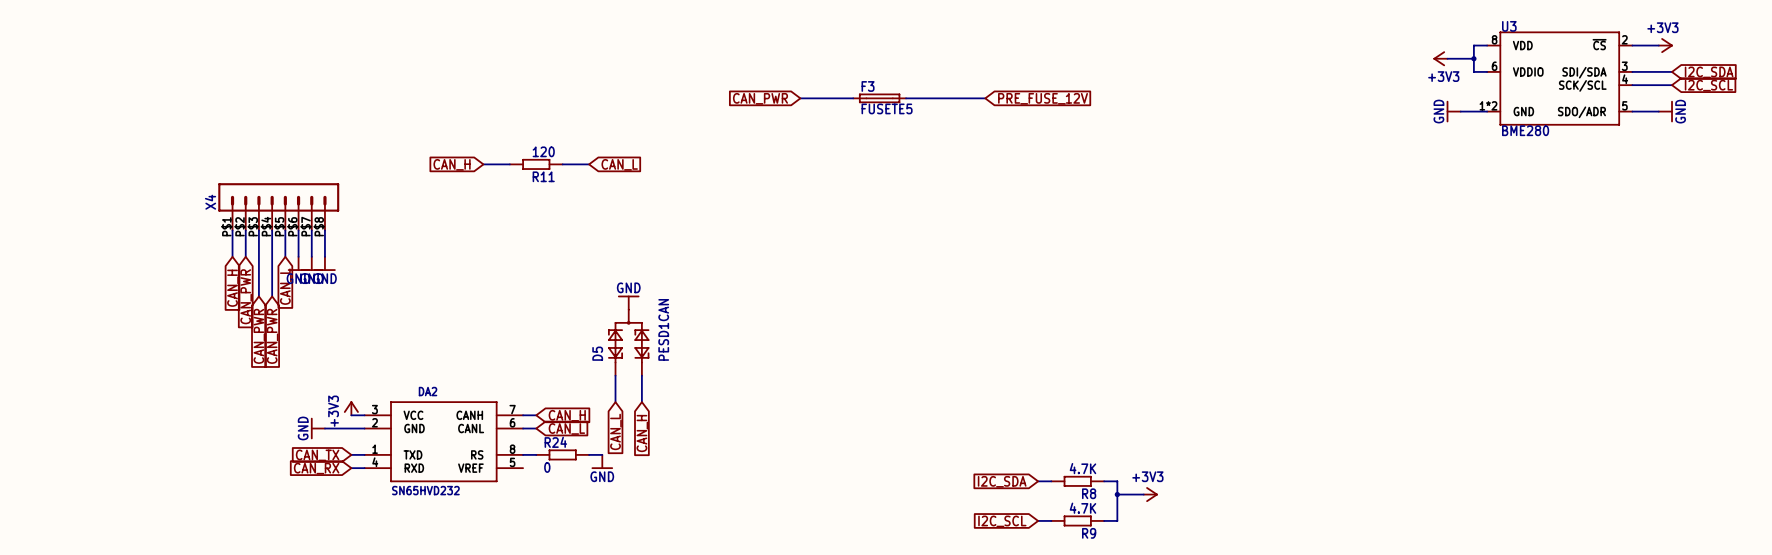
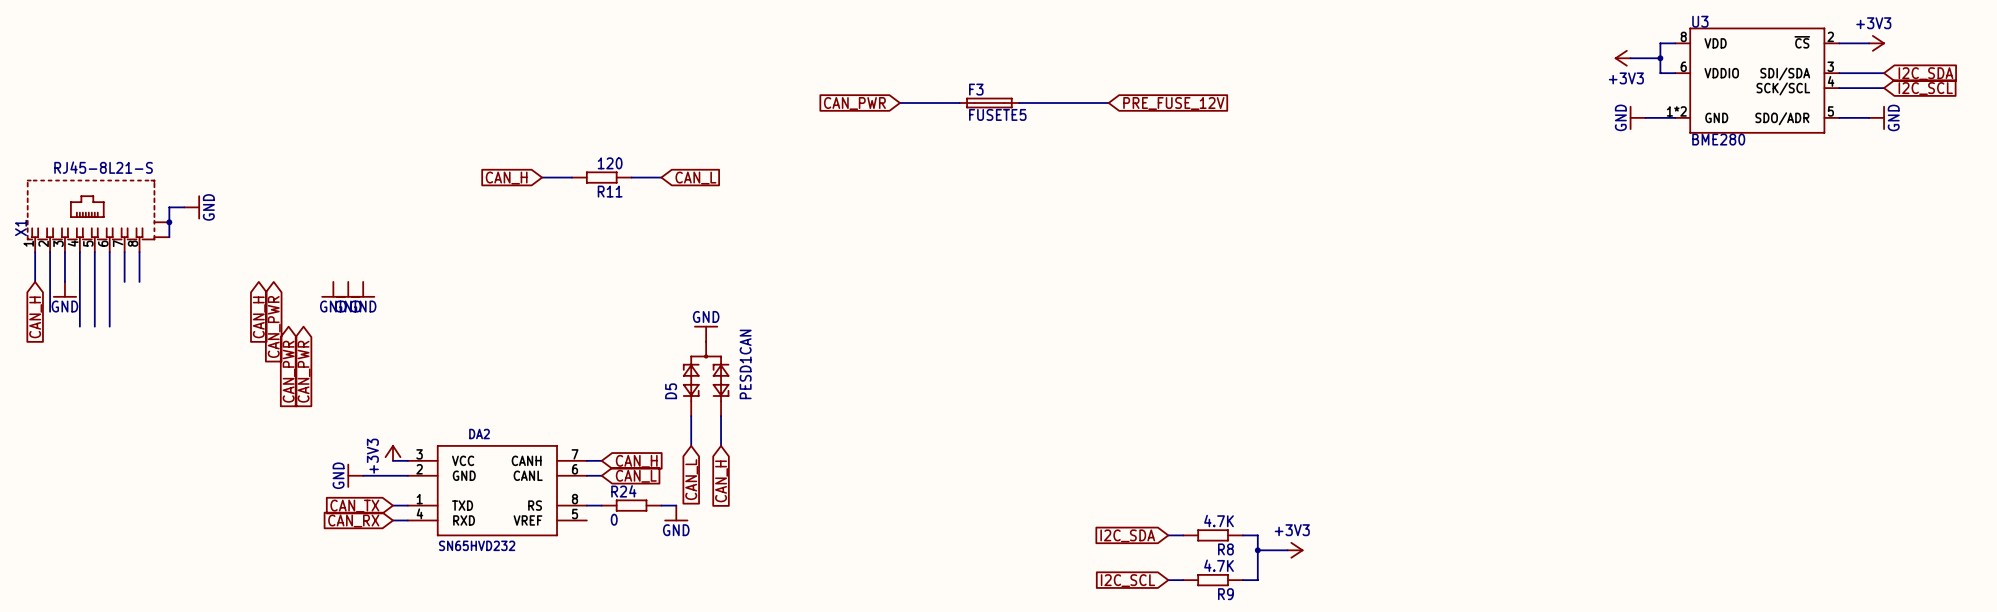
wire: none -> (184, 207) (169, 207) (169, 237)
power symbol: none -> GND (192, 207)
X1: none -> RJ45-8L21-S (98, 216)
junction: none -> (169, 222)
X4: (278, 206) -> none
wire: none -> (35, 252) (35, 281)
wire: none -> (50, 252) (50, 311)
wire: none -> (64, 252) (64, 281)
wire: none -> (79, 252) (79, 326)
wire: none -> (94, 252) (94, 326)
wire: none -> (109, 252) (109, 326)
wire: (232, 230) (232, 256) -> (124, 252) (124, 281)
wire: (245, 230) (245, 256) -> (139, 252) (139, 281)
wire: (258, 230) (258, 296) -> none
wire: (272, 230) (272, 296) -> none
wire: (285, 230) (285, 256) -> none
wire: (298, 230) (298, 256) -> none
wire: (311, 230) (311, 256) -> none
wire: (324, 230) (324, 256) -> none
power symbol: none -> GND (64, 289)
global label: CAN_L (285, 286) -> none
global label: none -> CAN_H (35, 317)

